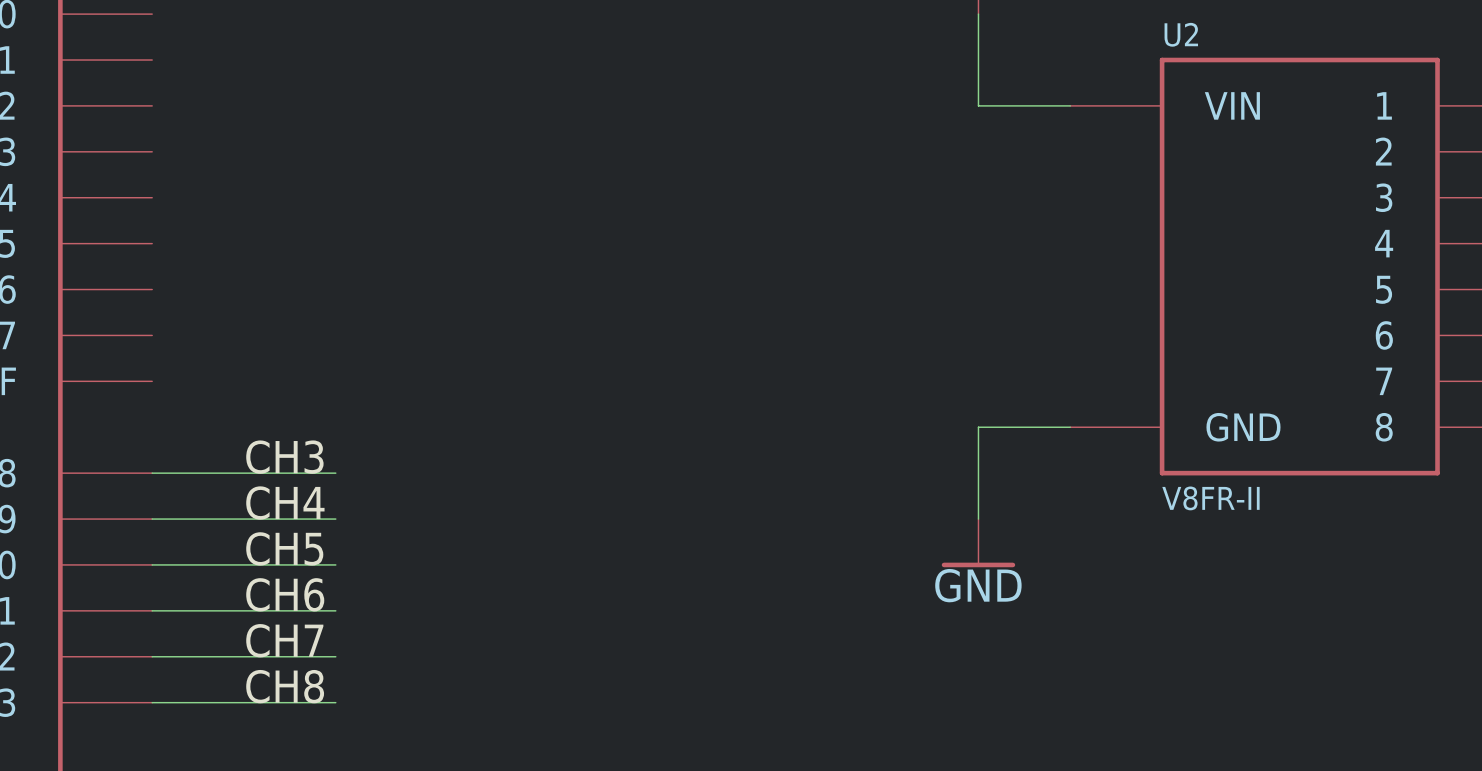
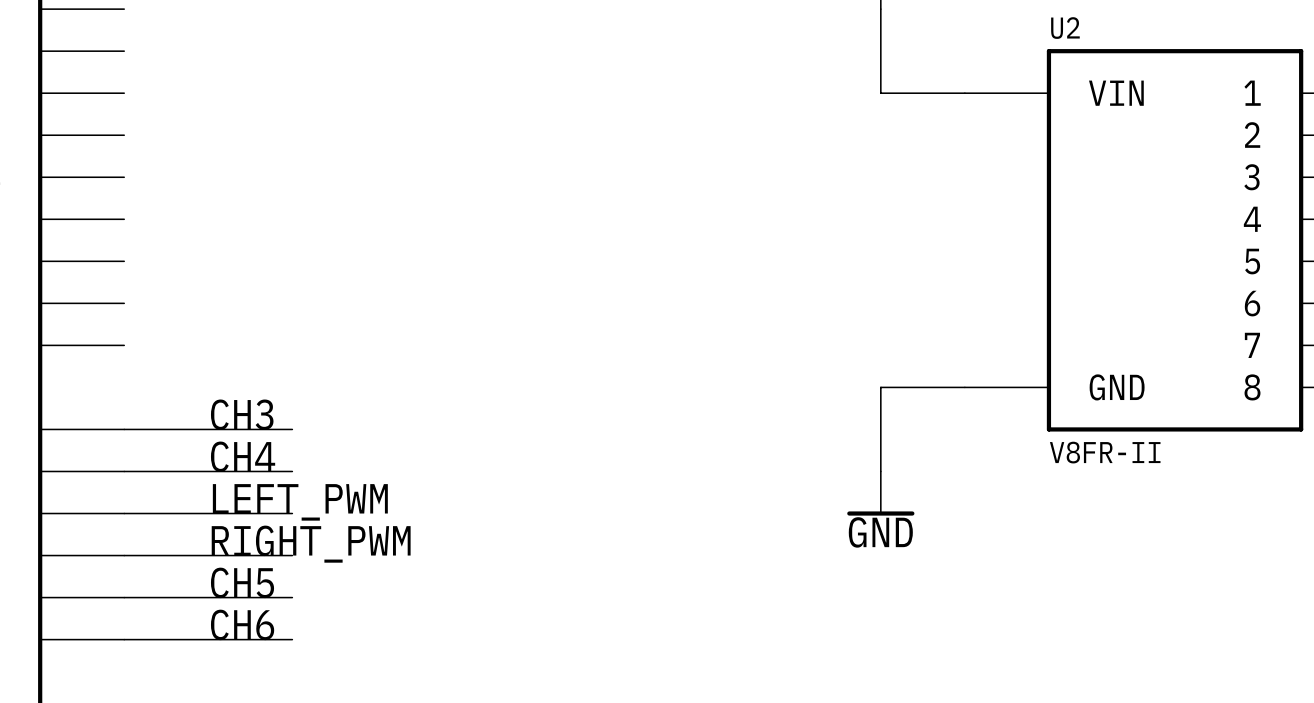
label: CH5 (284, 548) -> LEFT_PWM (300, 502)
label: CH6 (285, 594) -> RIGHT_PWM (311, 544)
label: CH7 (284, 640) -> CH5 (242, 582)
label: CH8 (285, 686) -> CH6 (242, 624)

